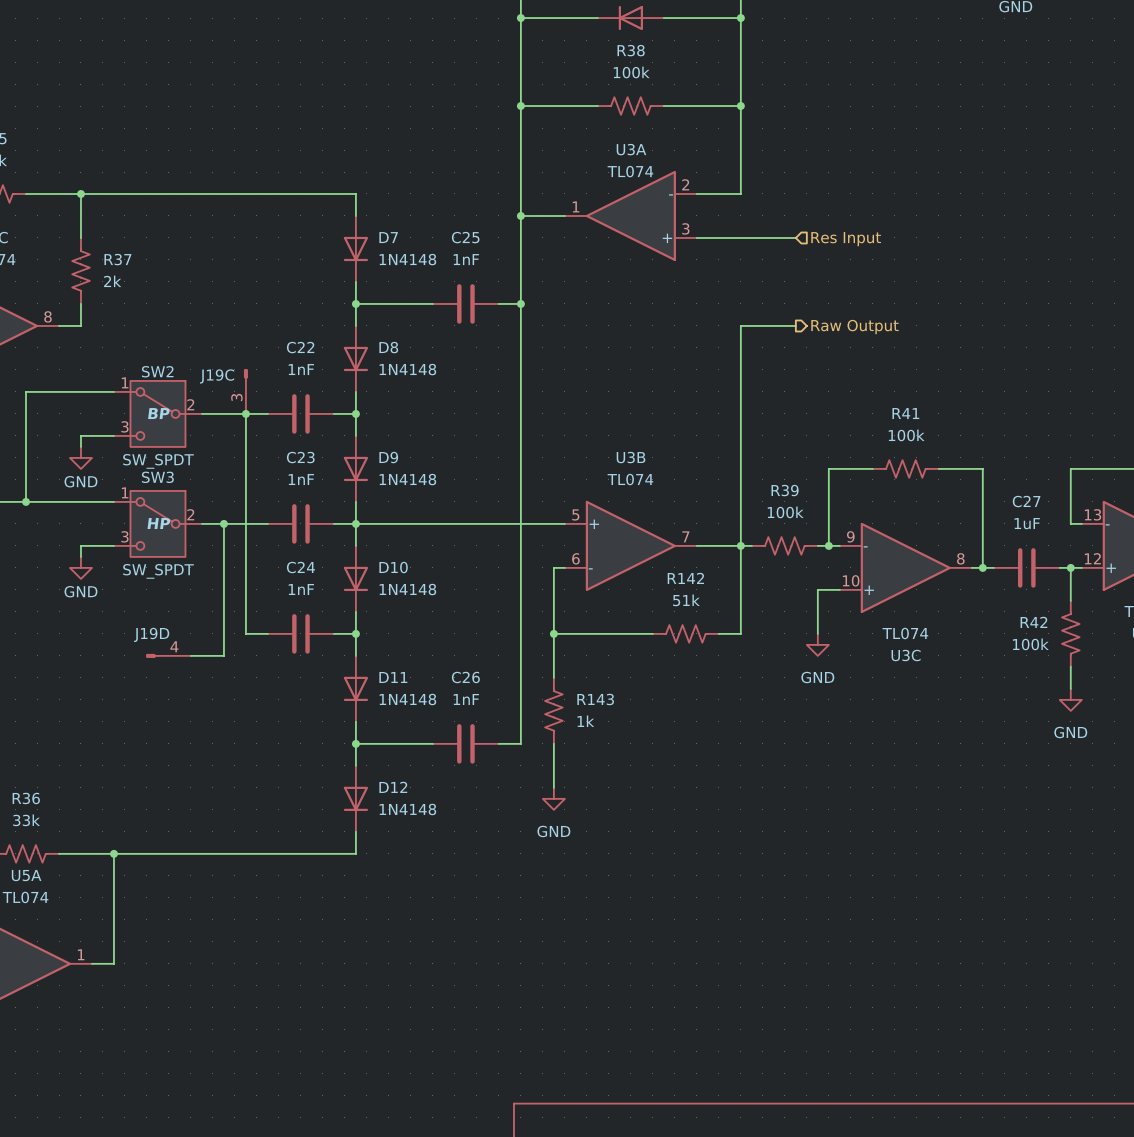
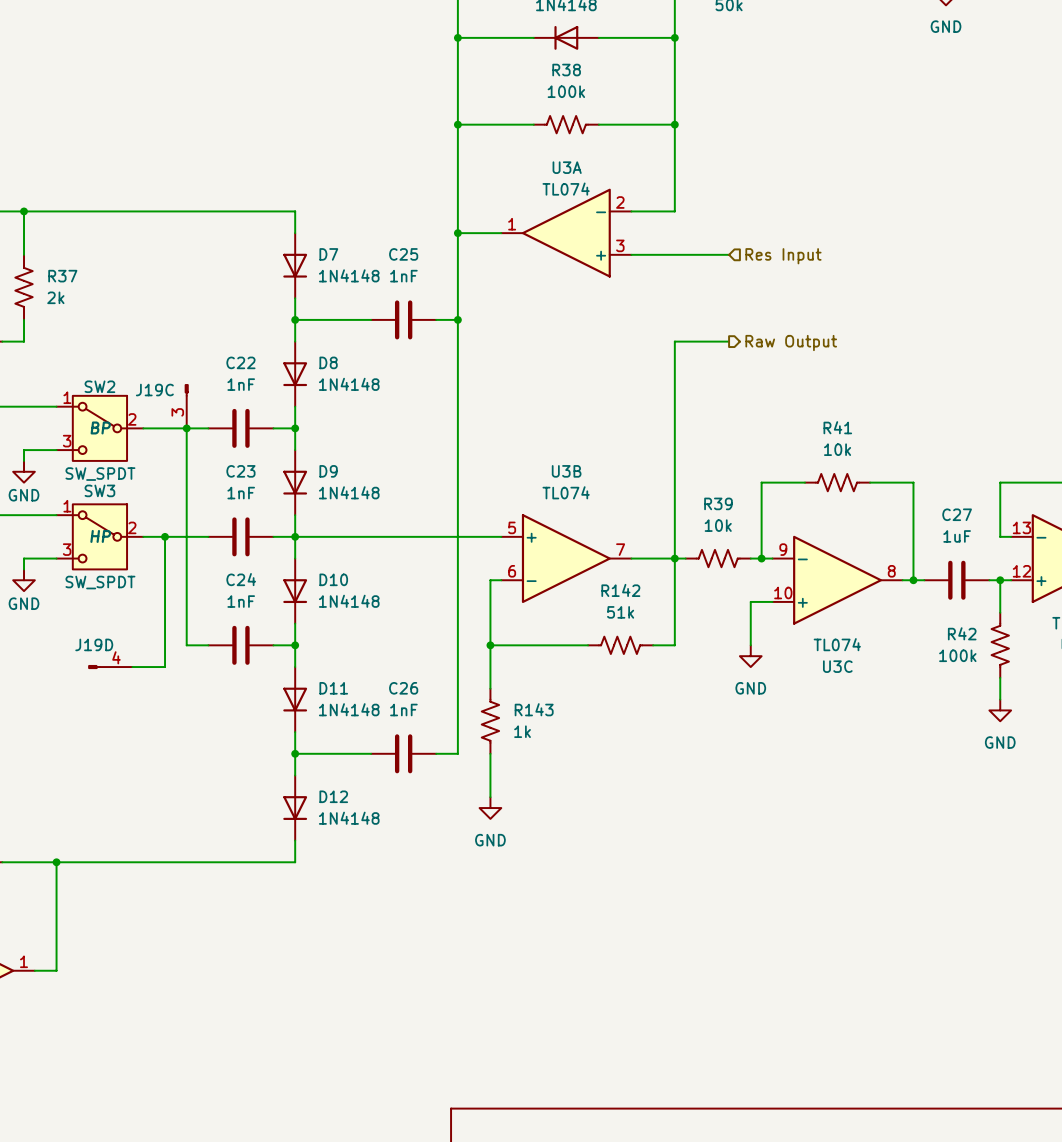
R41 value: 100k (906, 435) -> 10k (837, 449)
R39 value: 100k (785, 512) -> 10k (718, 525)

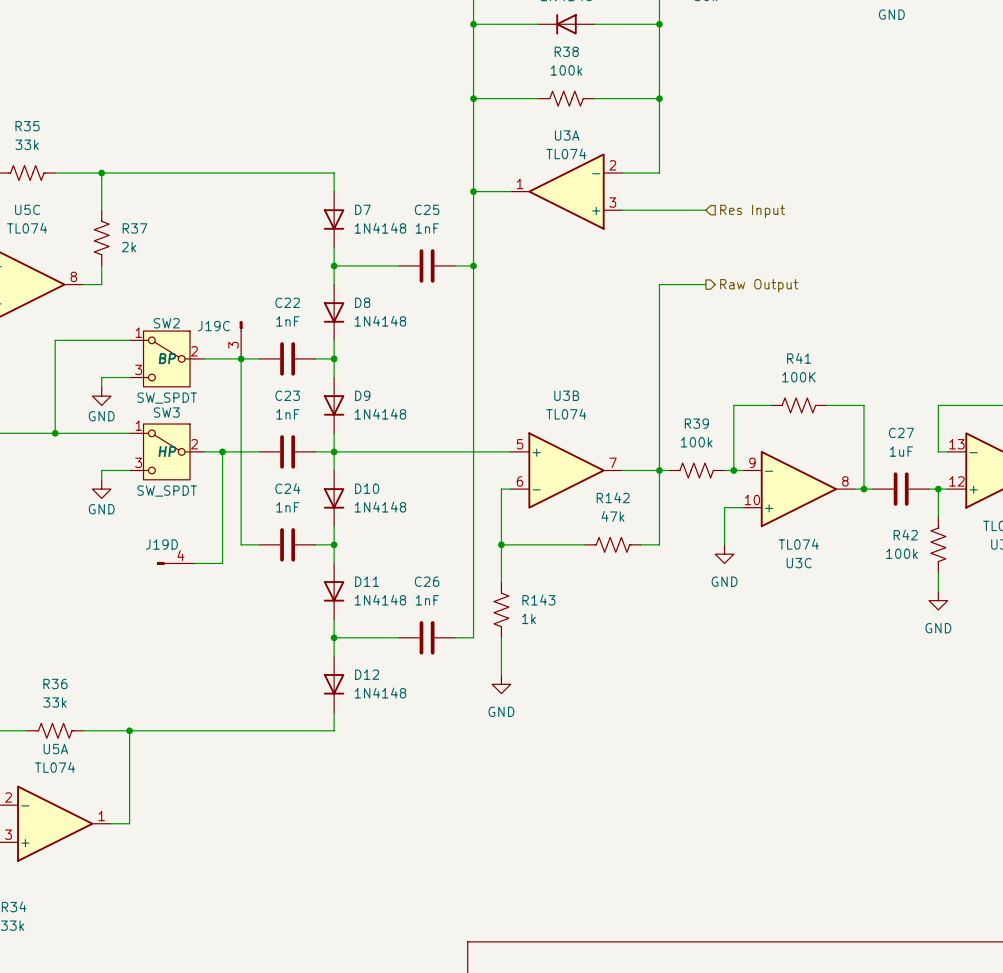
R41 value: 10k (837, 449) -> 100K (798, 377)
R39 value: 10k (718, 525) -> 100k (696, 442)
R142 value: 51k (620, 612) -> 47k (612, 516)

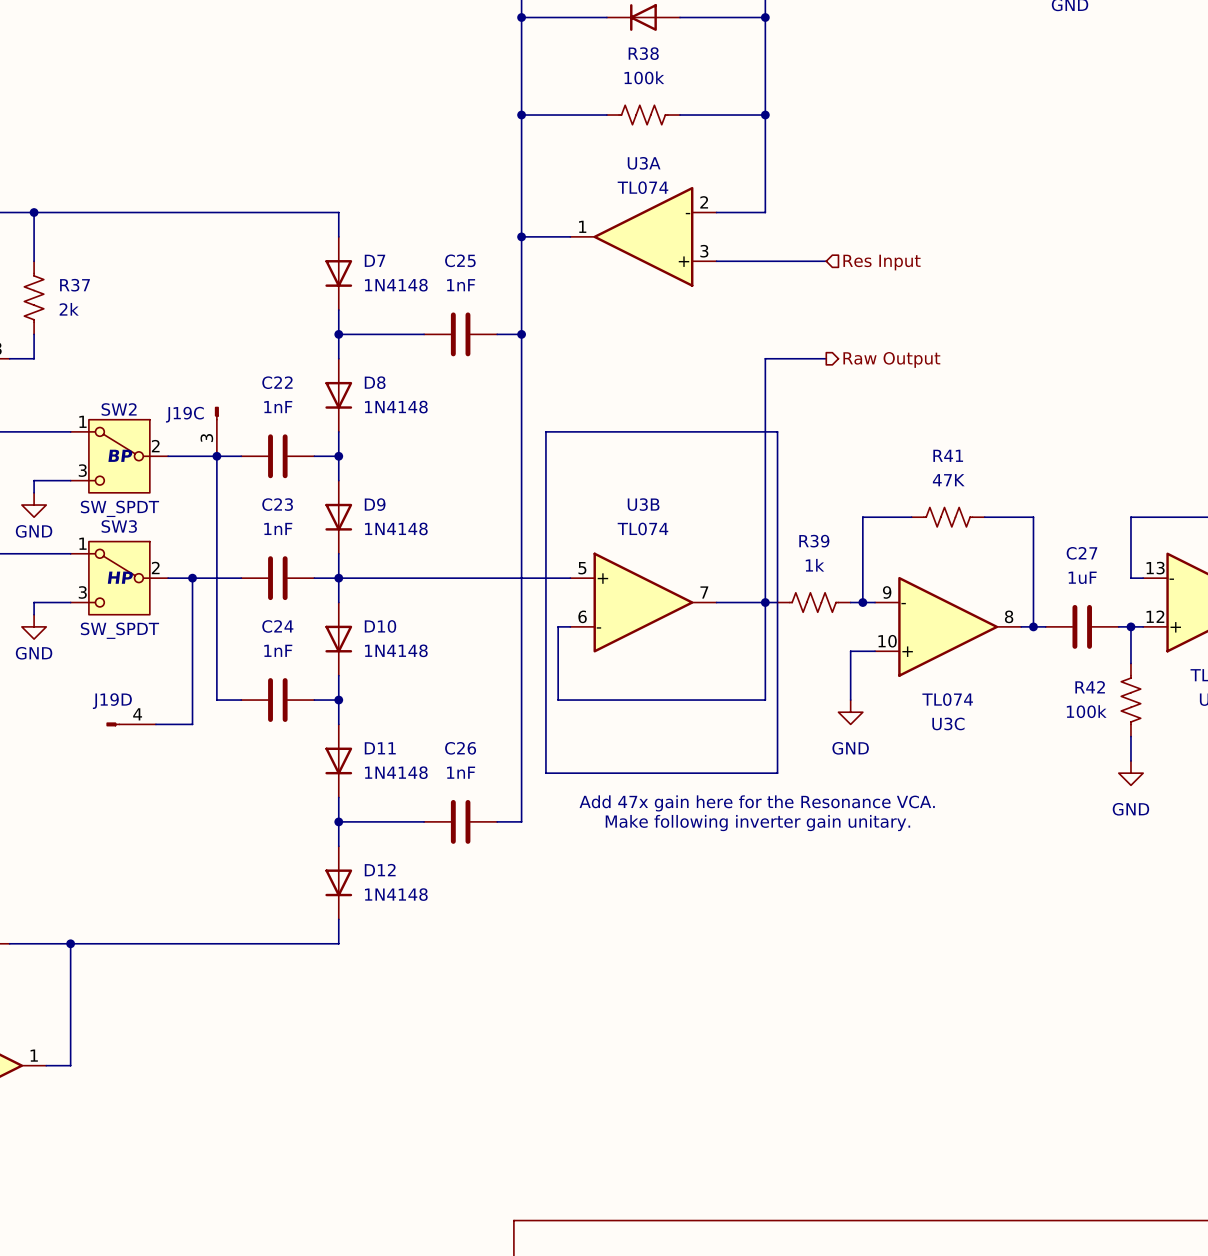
line: none -> (545, 431) (777, 431) (777, 773) (545, 773) (545, 431)
R41 value: 100K (798, 377) -> 47K (948, 480)
R39 value: 100k (696, 442) -> 1k (814, 565)
wire: (501, 544) (501, 582) -> none
junction: (501, 544) -> none
R142: 47k (612, 544) -> none
R143: 1k (501, 609) -> none
text: none -> Add 47x gain here for the Resonance VCA. (757, 803)
wire: (501, 637) (501, 675) -> none
text: none -> Make following inverter gain unitary. (757, 823)
power symbol: GND (501, 684) -> none

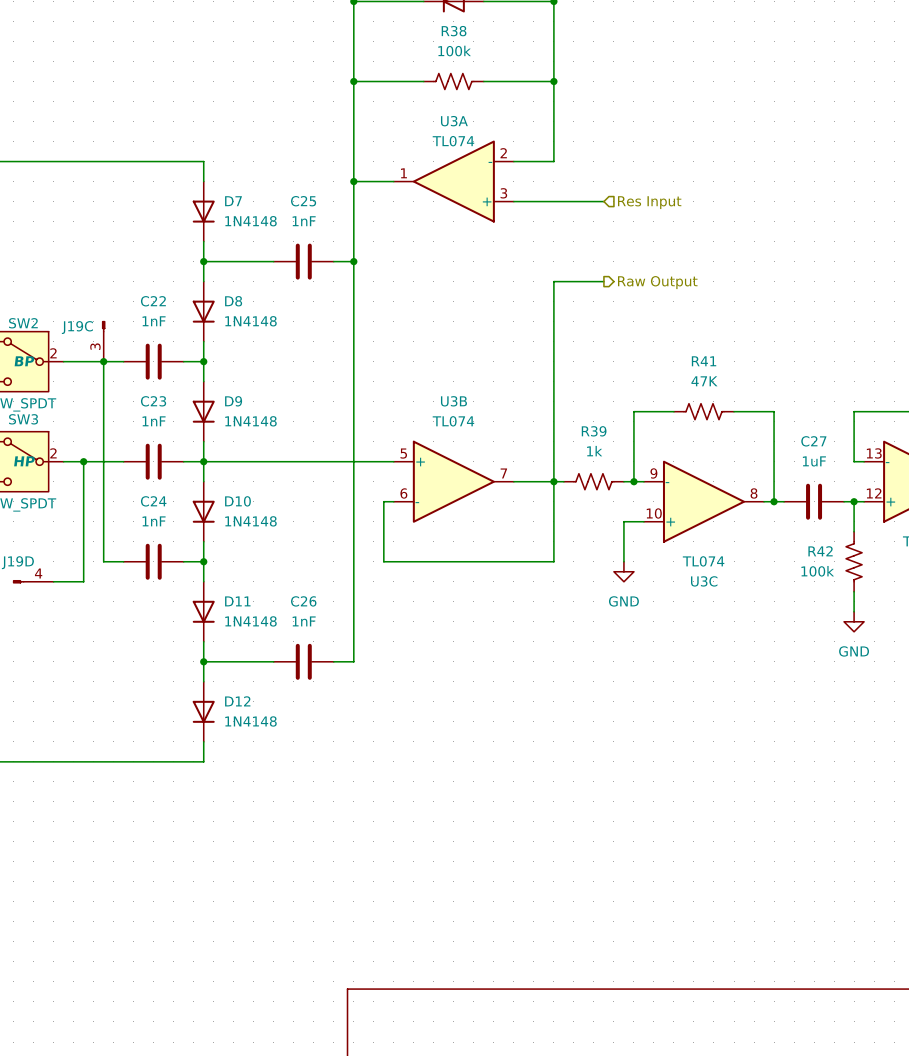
line: (545, 431) (777, 431) (777, 773) (545, 773) (545, 431) -> none
text: Add 47x gain here for the Resonance VCA. (757, 803) -> none
text: Make following inverter gain unitary. (757, 823) -> none

